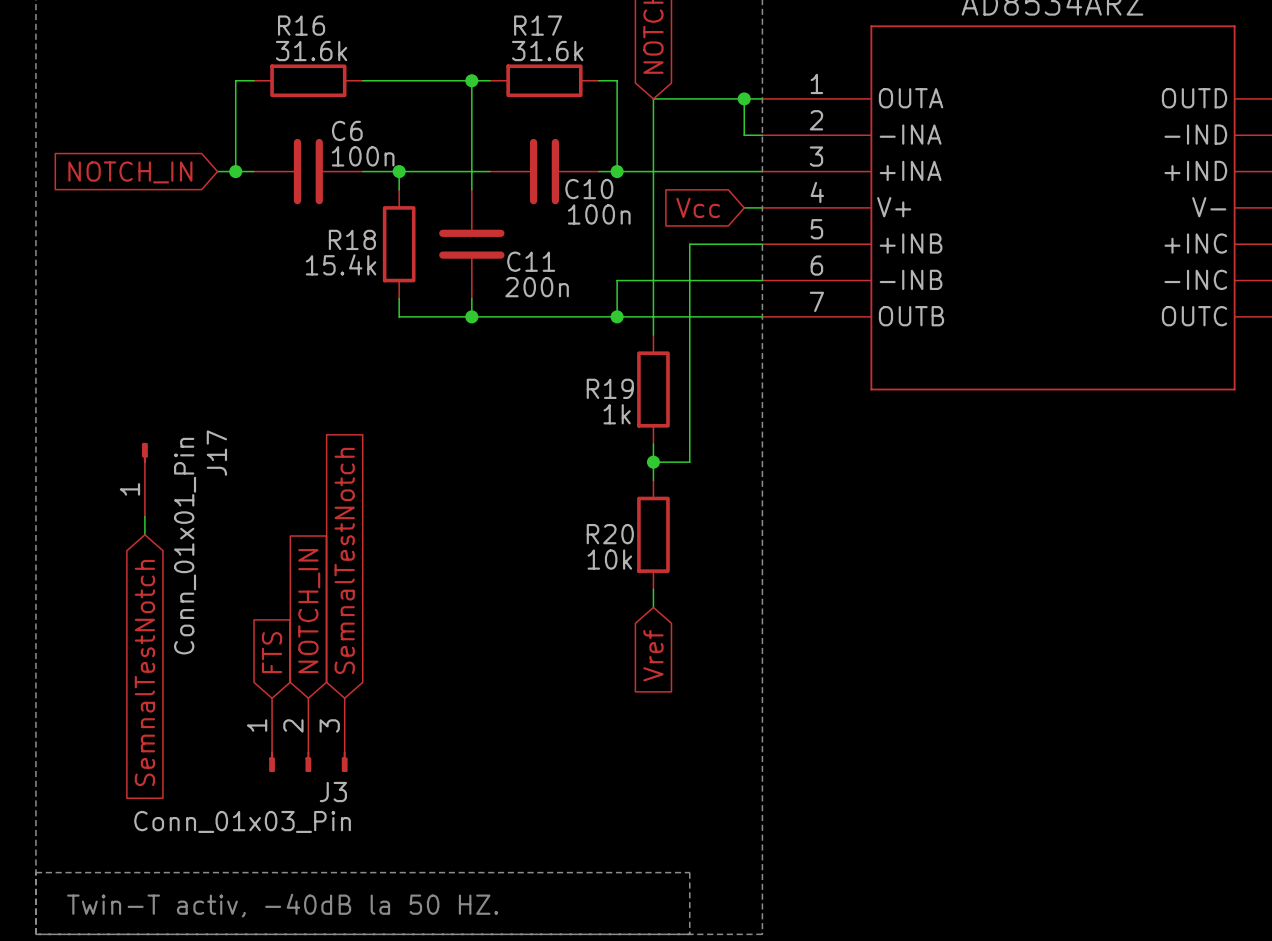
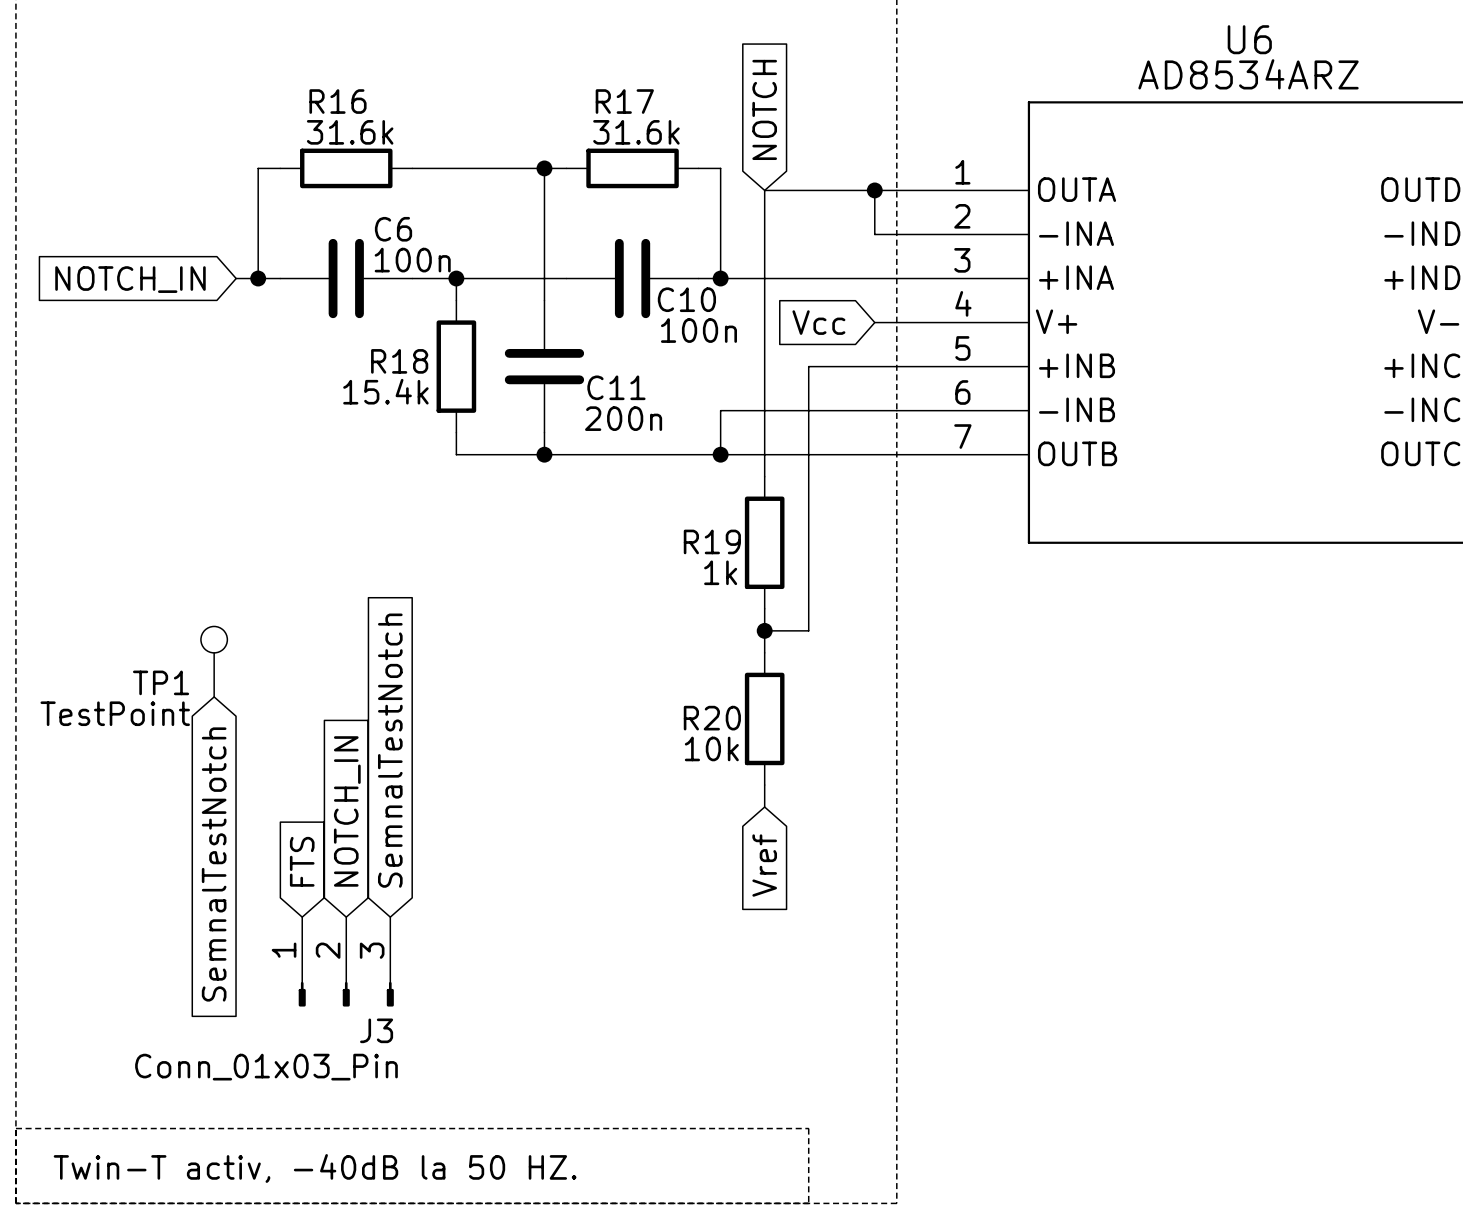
J17: Conn_01x01_Pin (144, 479) -> none
TP1: none -> TestPoint (214, 661)
wire: (144, 516) (144, 534) -> none
global label position: SemnalTestNotch (144, 672) -> SemnalTestNotch (214, 864)

